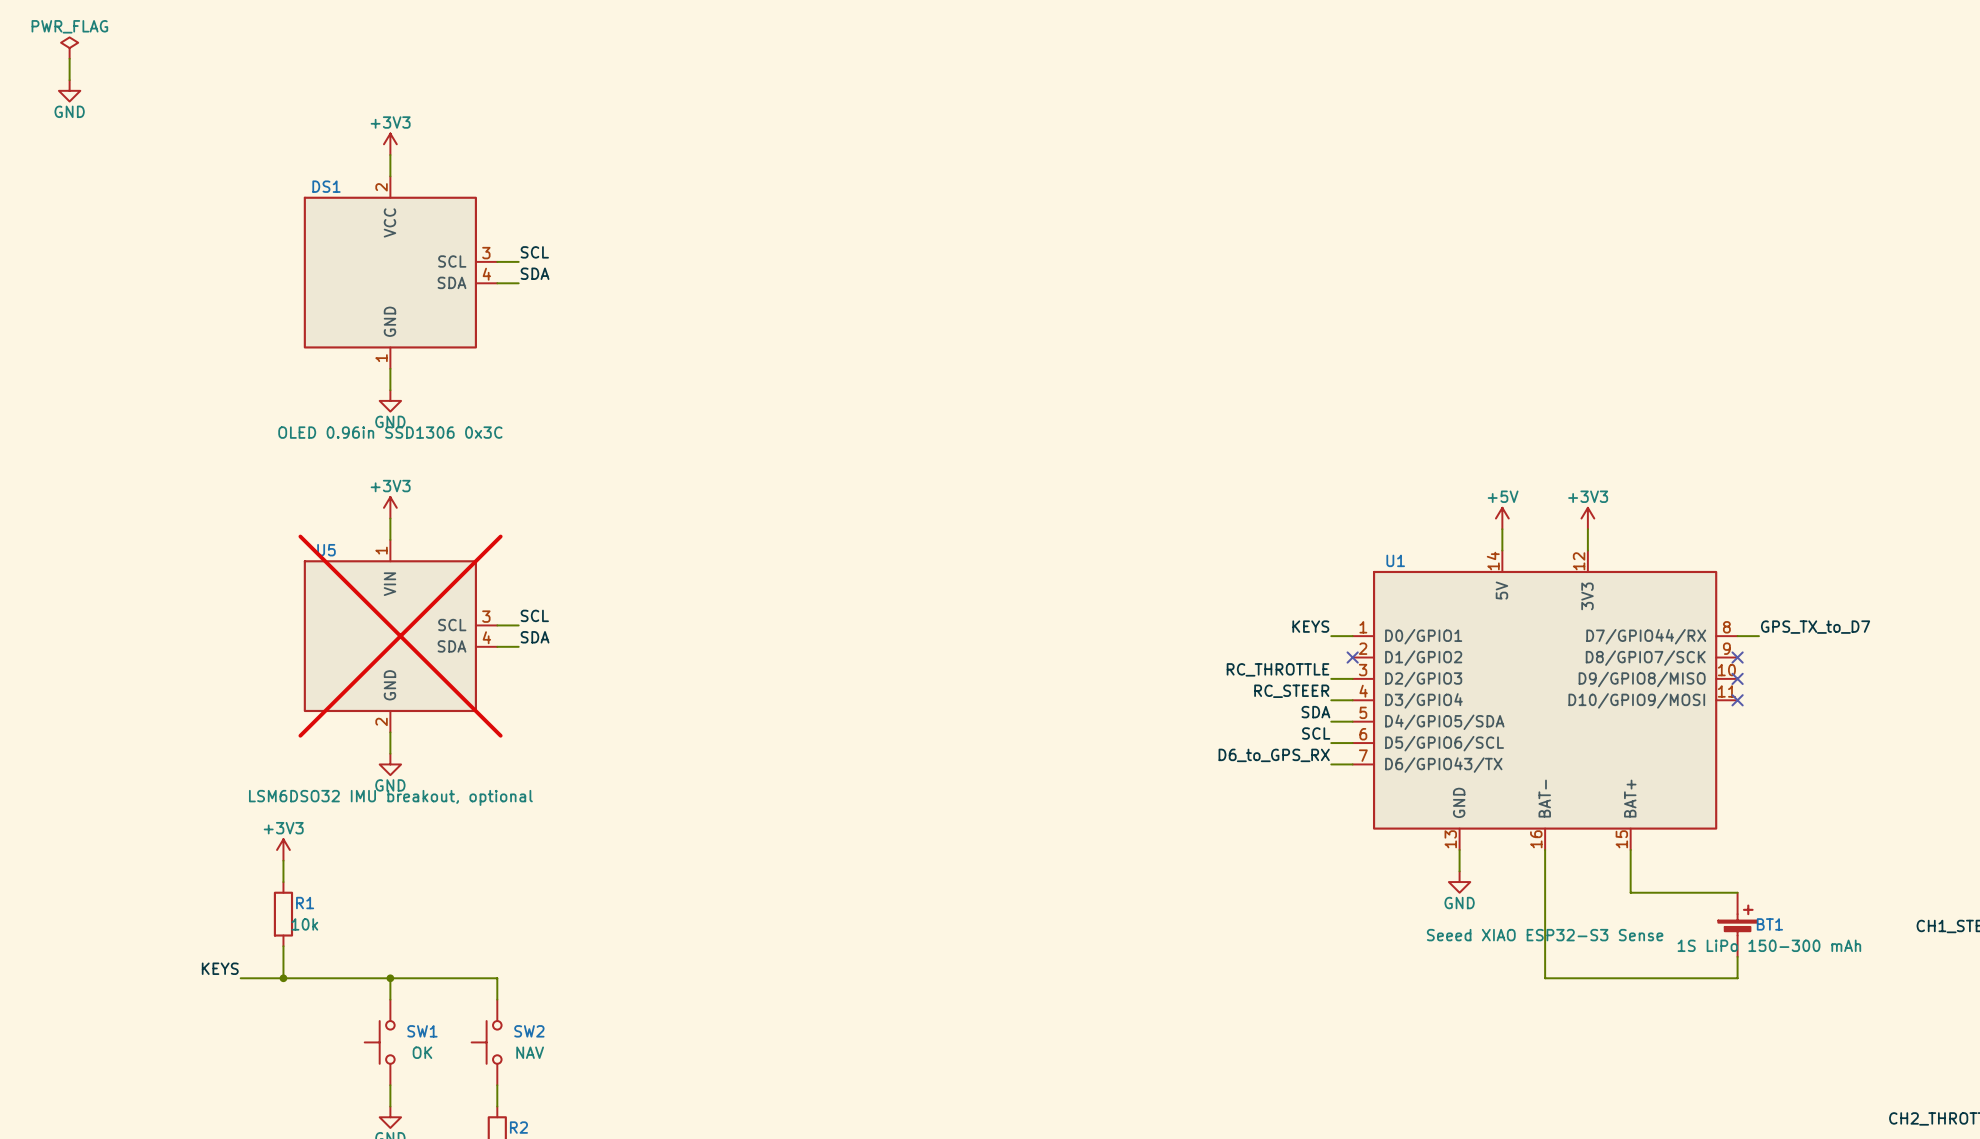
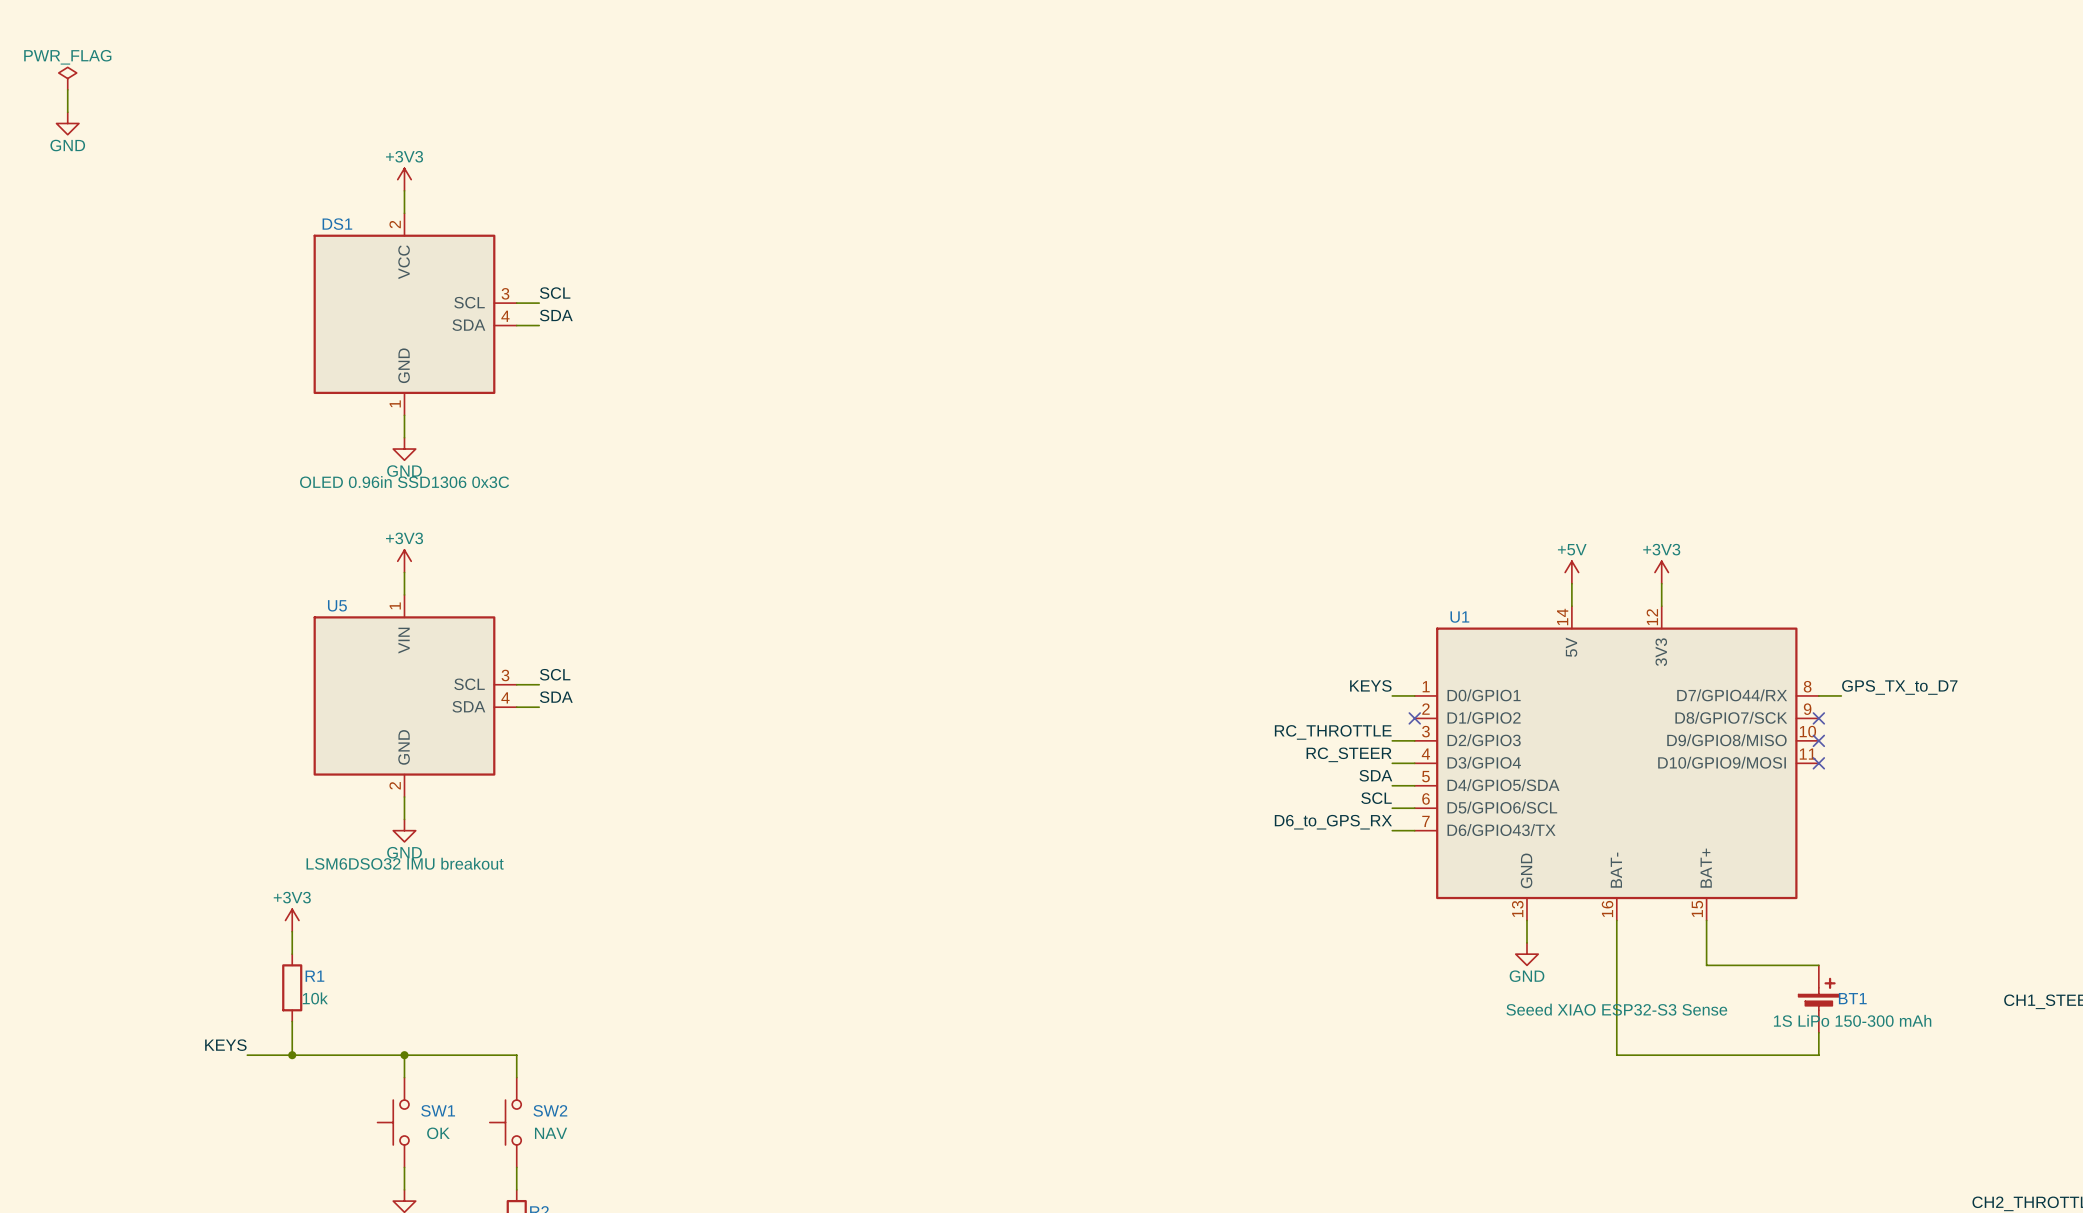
U5 do-not-place cross: (400, 636) -> none
U5 value: LSM6DSO32 IMU breakout, optional (390, 797) -> LSM6DSO32 IMU breakout (405, 863)

